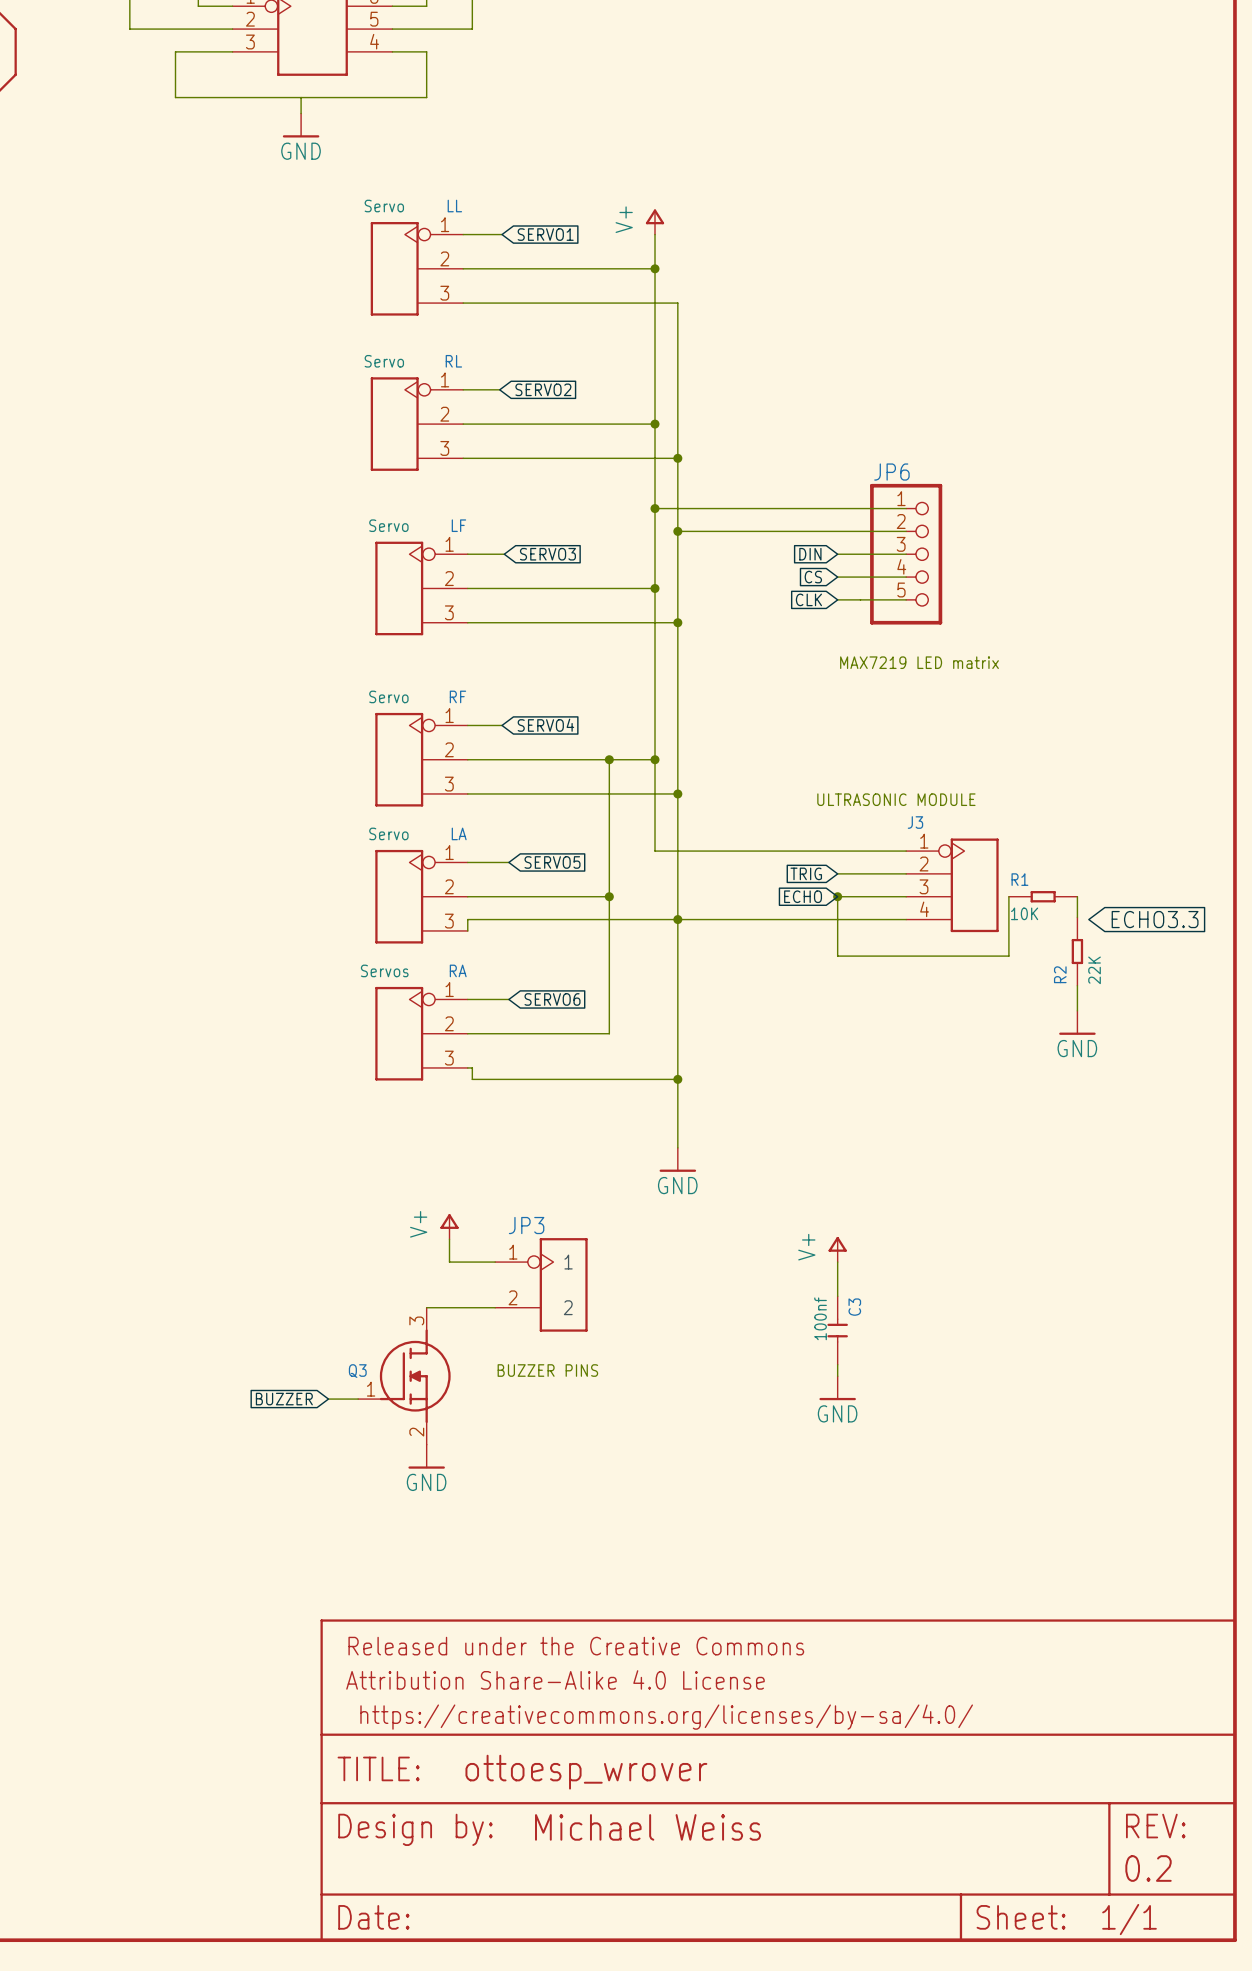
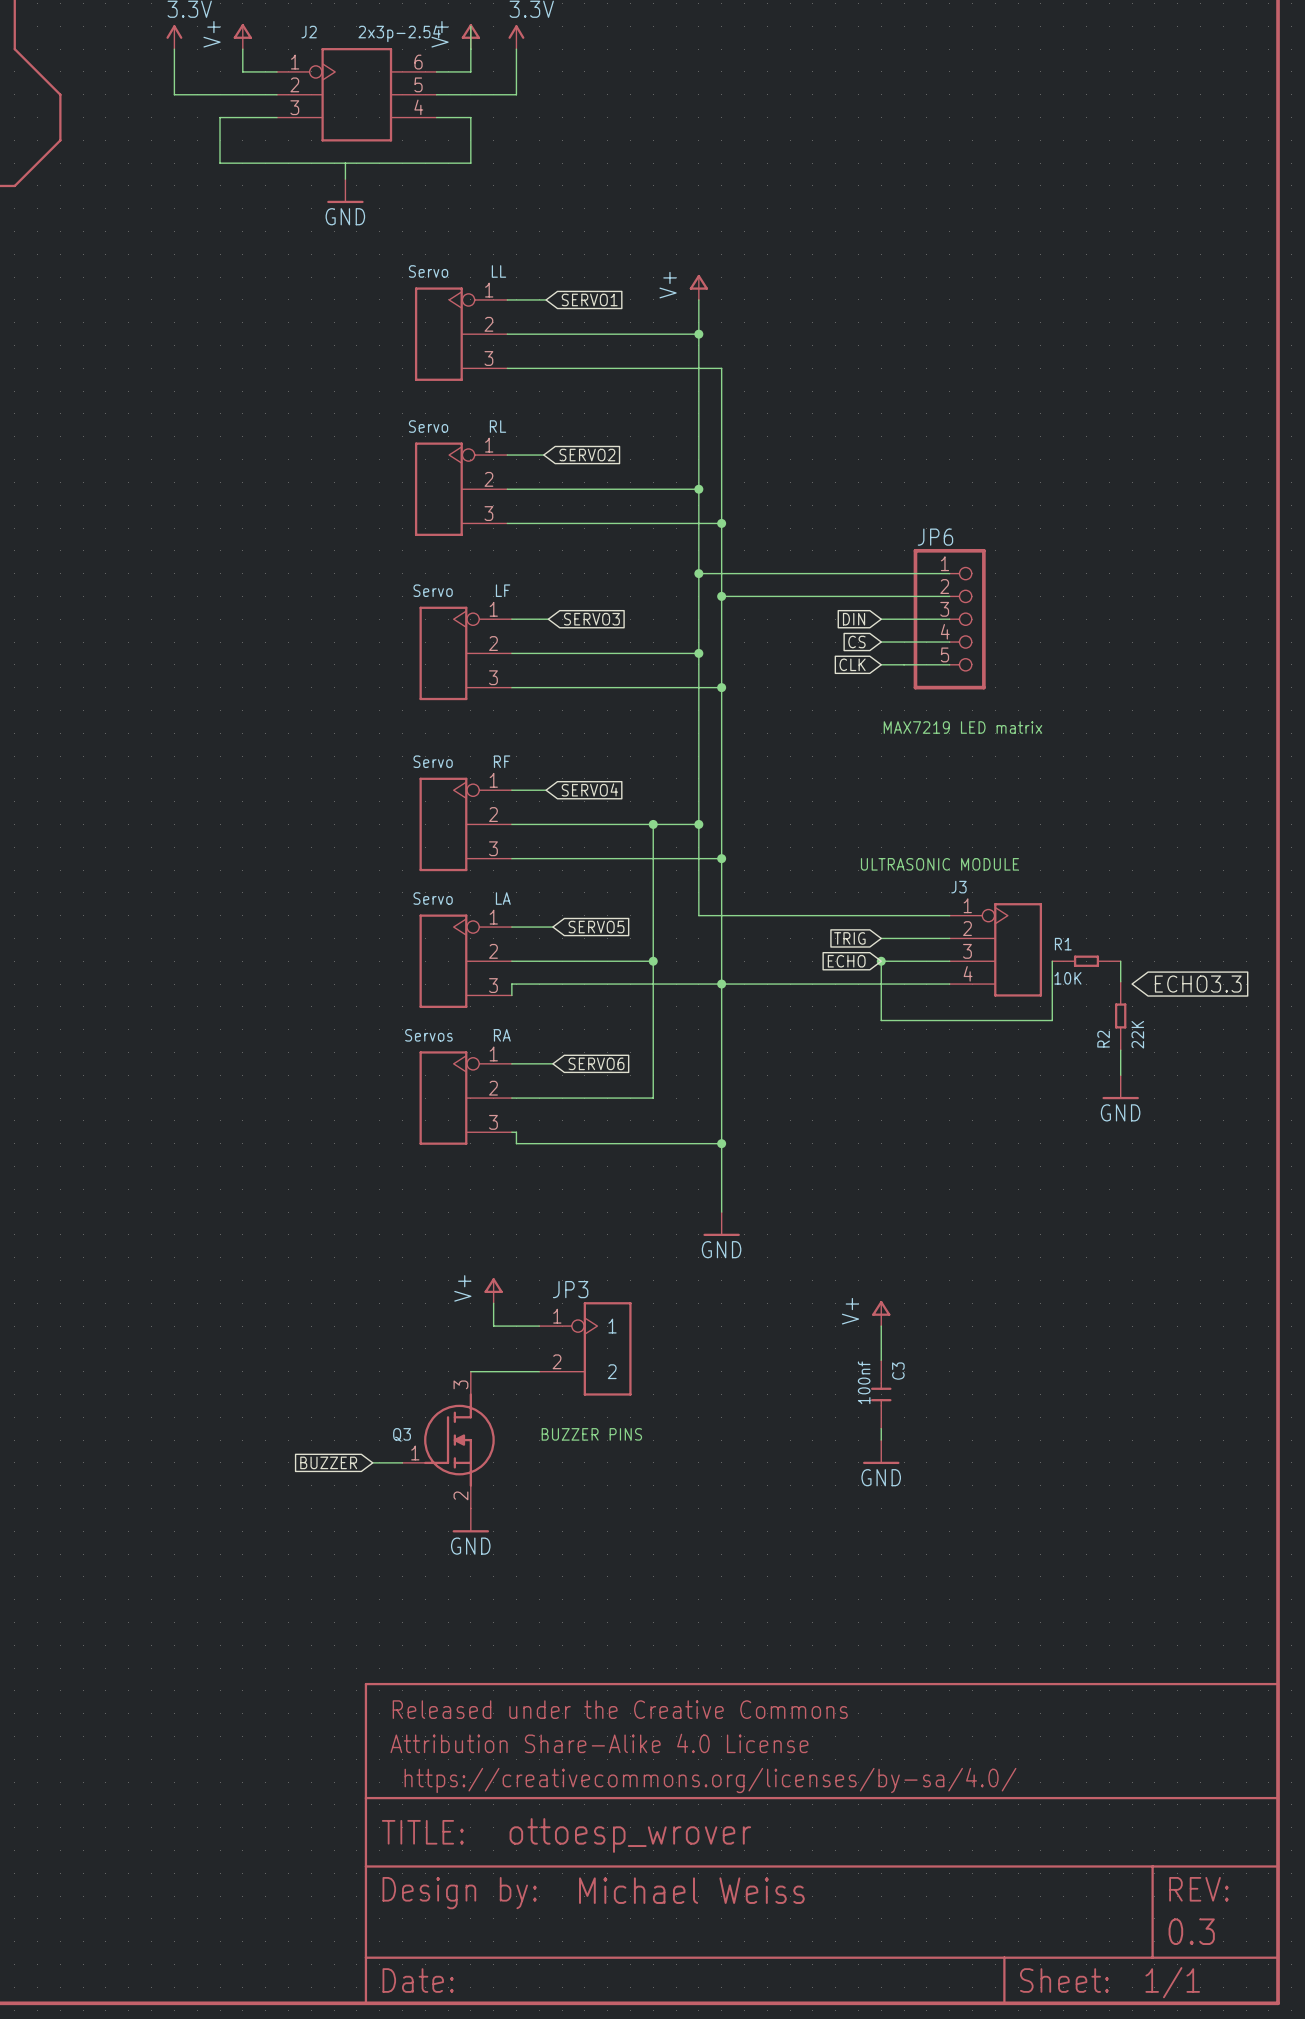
part text: 0.2 (1148, 1868) -> 0.3 (1191, 1931)

